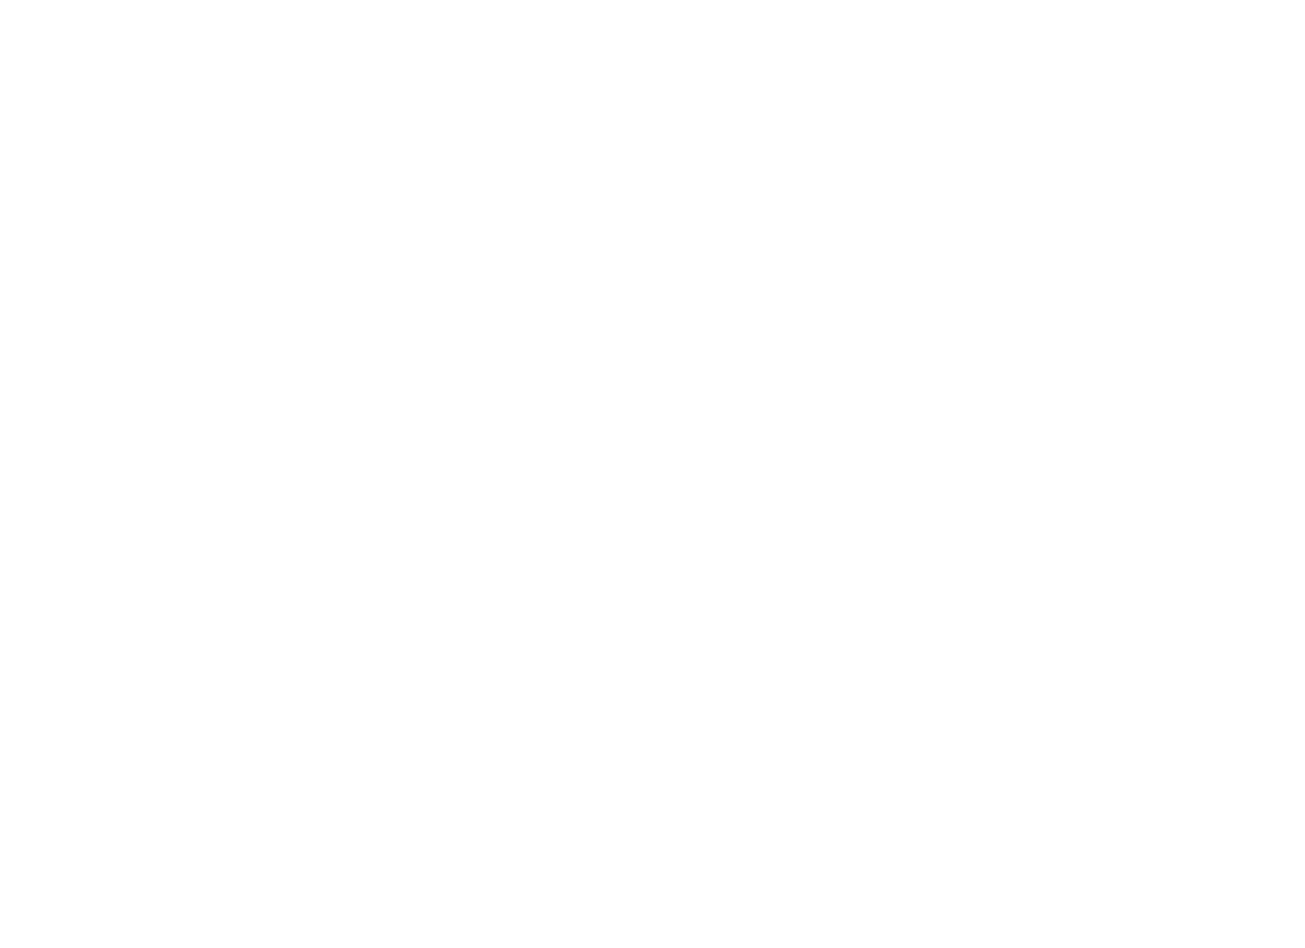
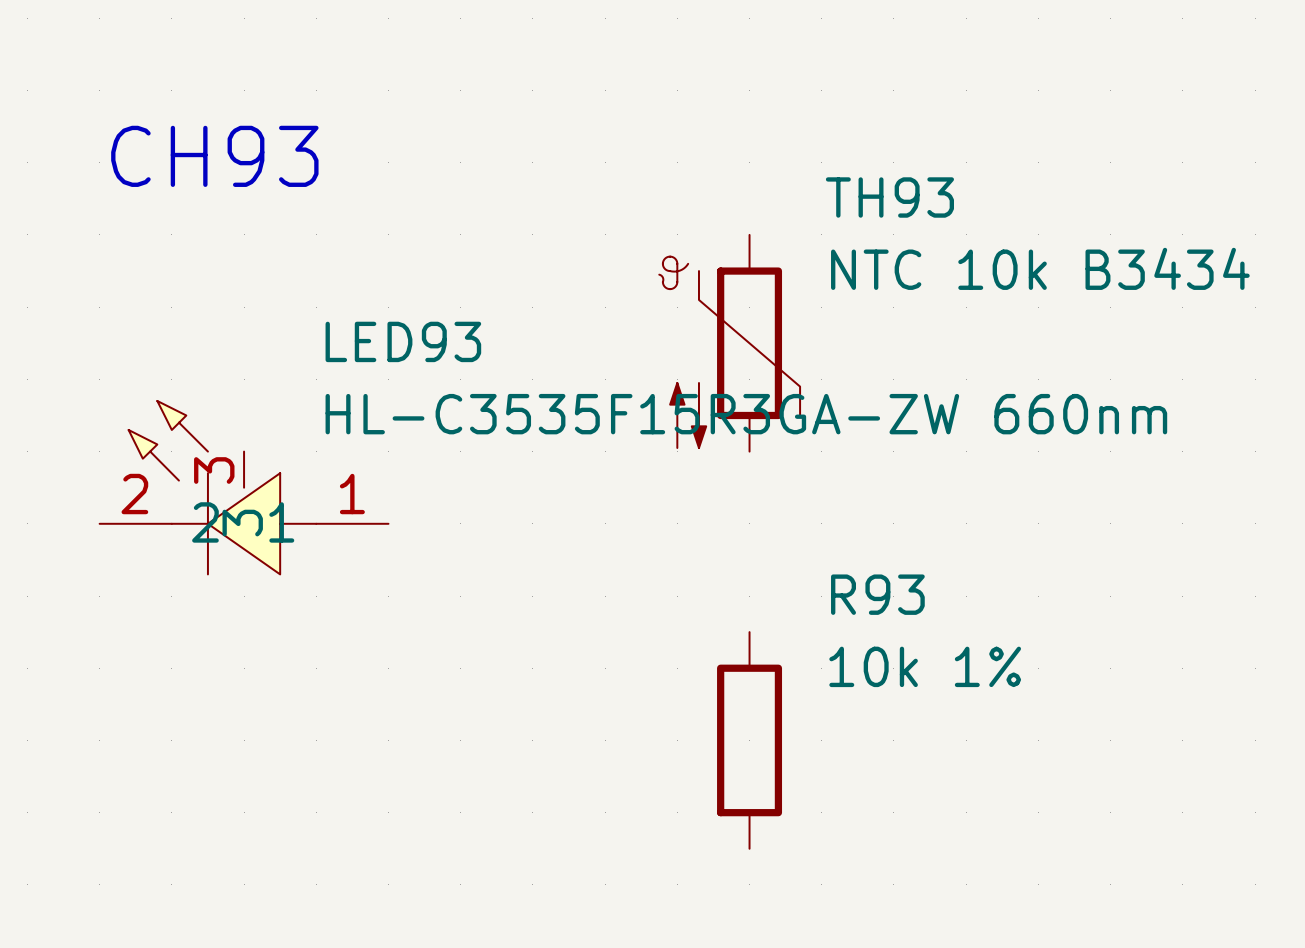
text: none -> CH93 (214, 156)
TH93: none -> NTC 10k B3434 (729, 343)
LED93: none -> HL-C3535F15R3GA-ZW 660nm (244, 487)
R93: none -> 10k 1% (749, 740)

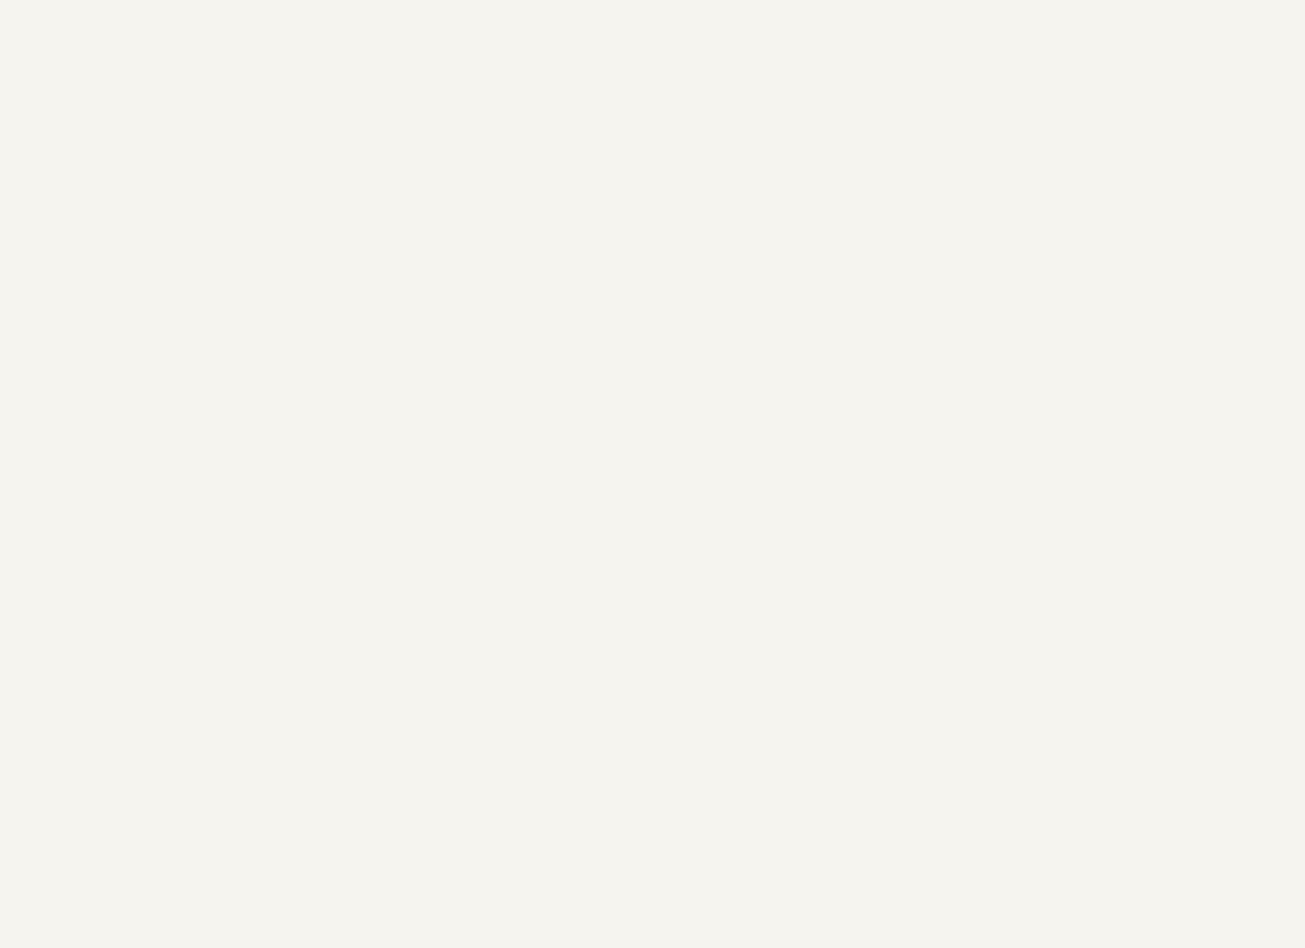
text: CH93 (214, 156) -> none
TH93: NTC 10k B3434 (729, 343) -> none
LED93: HL-C3535F15R3GA-ZW 660nm (244, 487) -> none
R93: 10k 1% (749, 740) -> none

